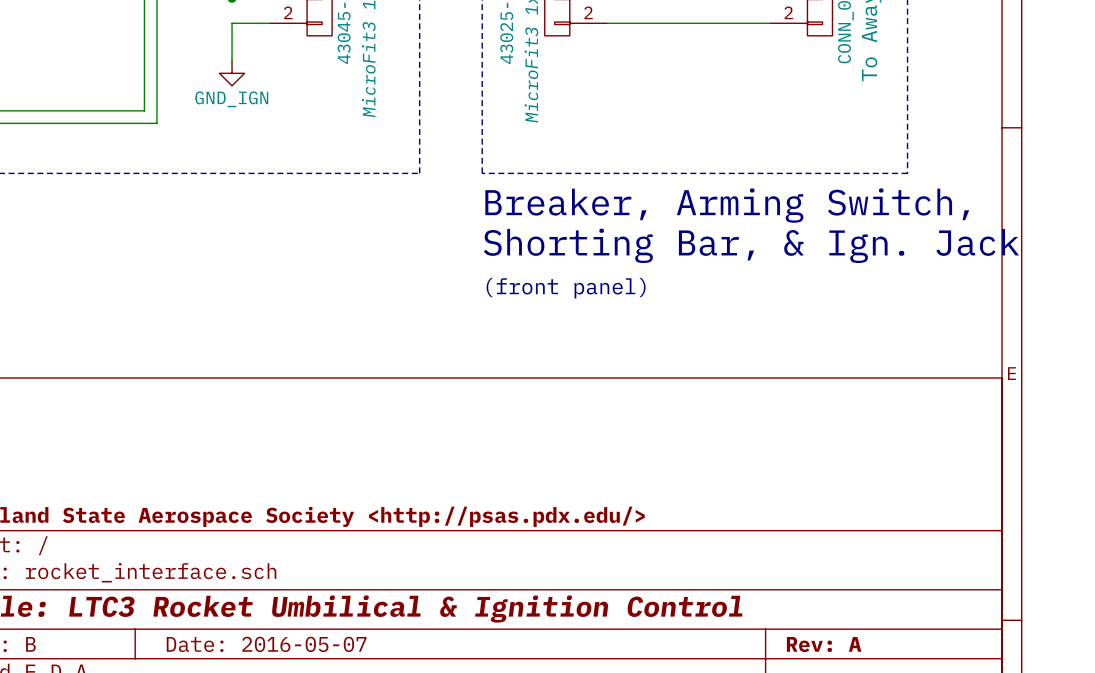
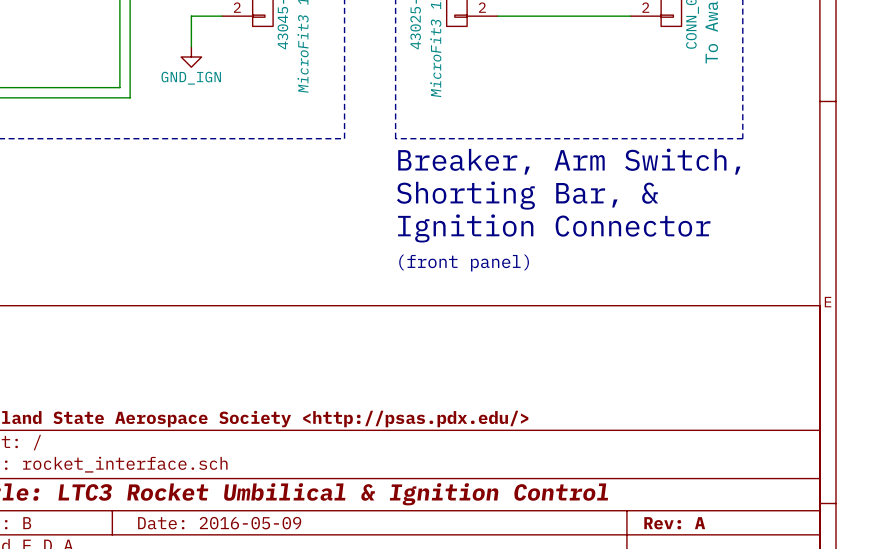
text: Breaker, Arming Switch, (727, 205) -> Breaker, Arm Switch, (569, 161)
text: Shorting Bar, & Ign. Jack (751, 245) -> Shorting Bar, & (527, 195)
text: (front panel) (566, 288) -> Ignition Connector (554, 228)
text: none -> (front panel) (464, 263)
title block: Date: 2016-05-07 (266, 644) -> Date: 2016-05-09 (219, 523)

